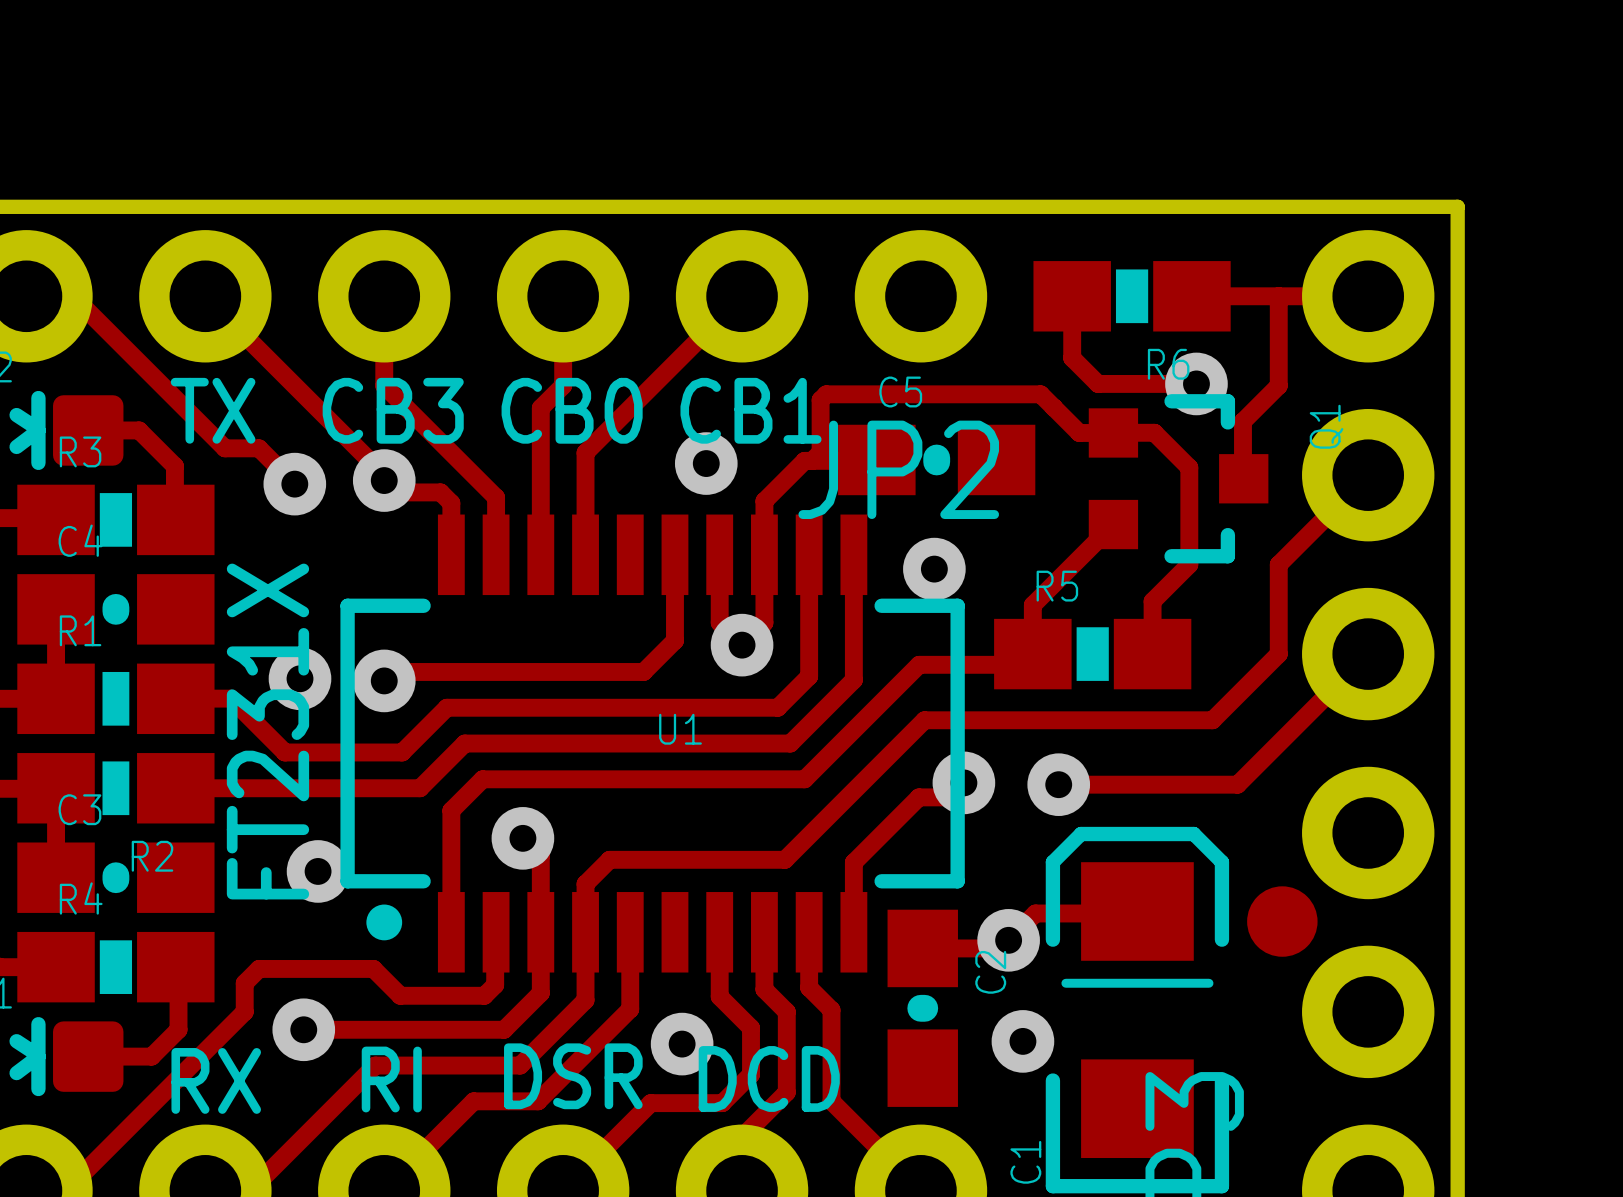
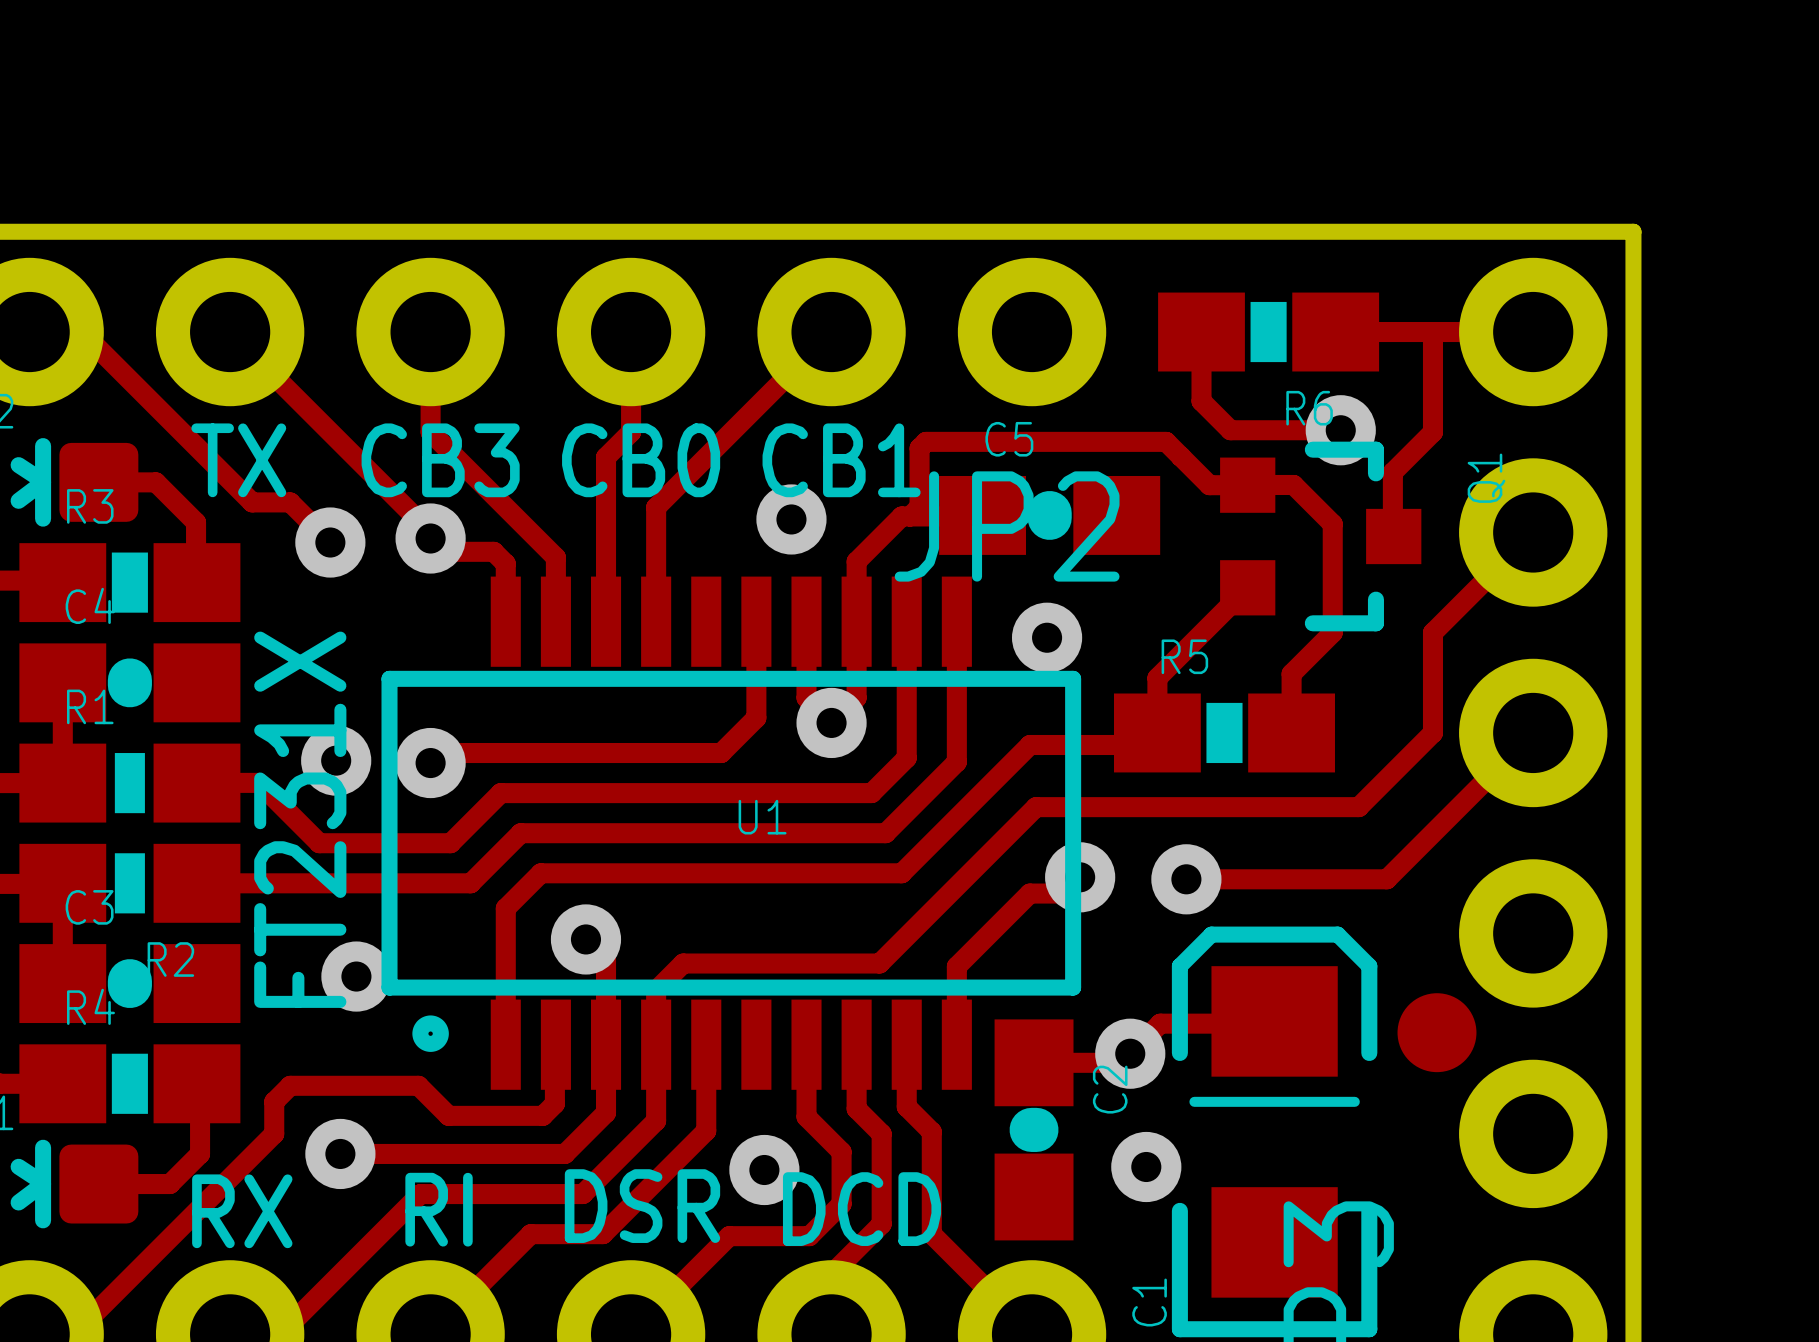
C5 footprint: [838, 424, 1036, 496] -> [939, 475, 1161, 555]
U1 footprint: [340, 514, 965, 973] -> [381, 576, 1082, 1090]
C4 footprint: [17, 574, 215, 645] -> [19, 643, 241, 723]
C3 footprint: [17, 842, 215, 913] -> [19, 944, 241, 1024]
C2 footprint: [887, 909, 958, 1107] -> [994, 1019, 1074, 1241]

